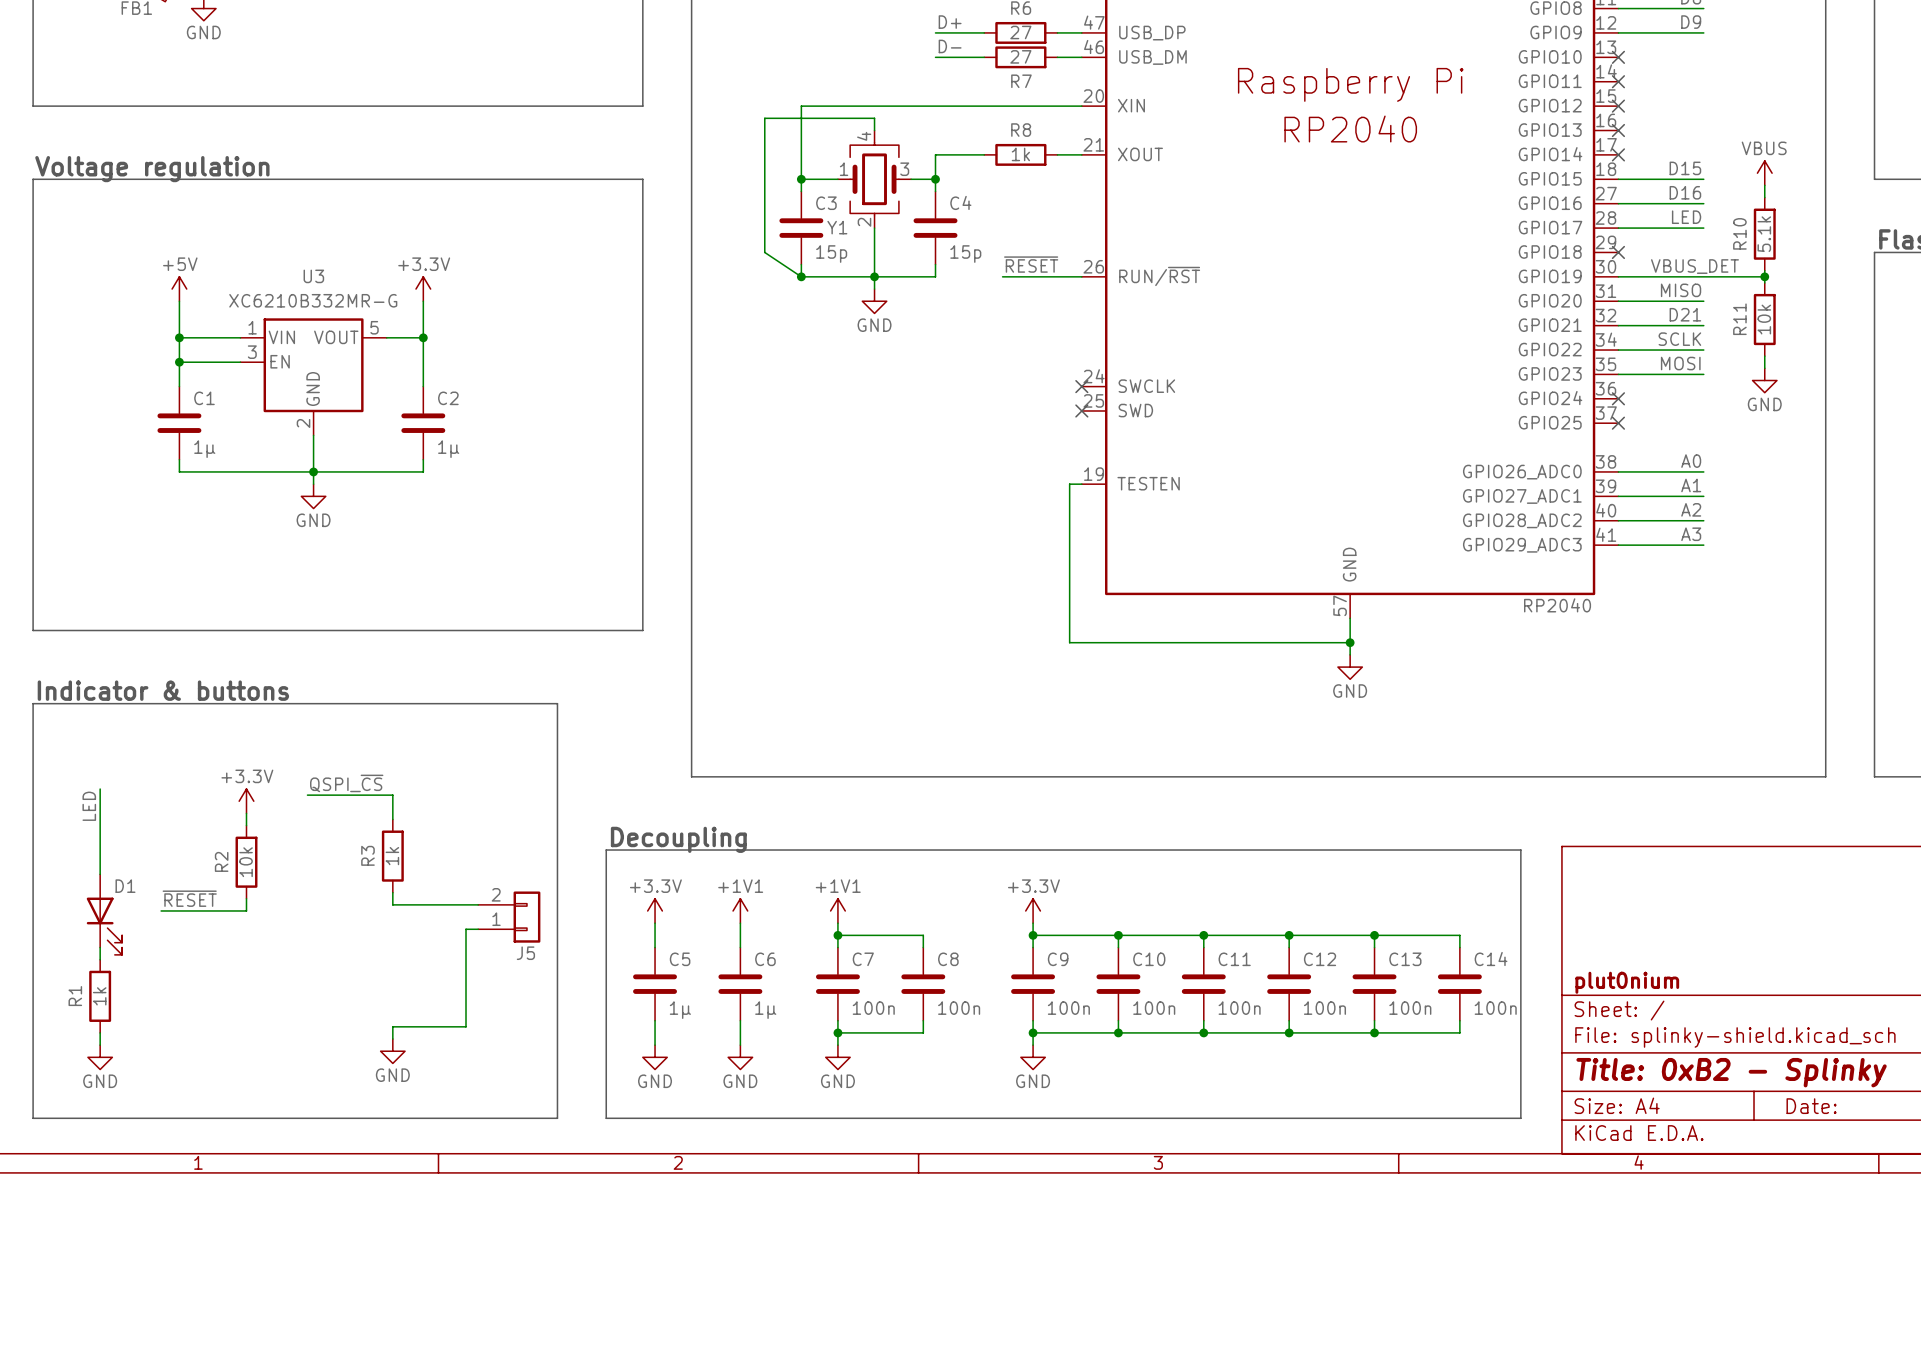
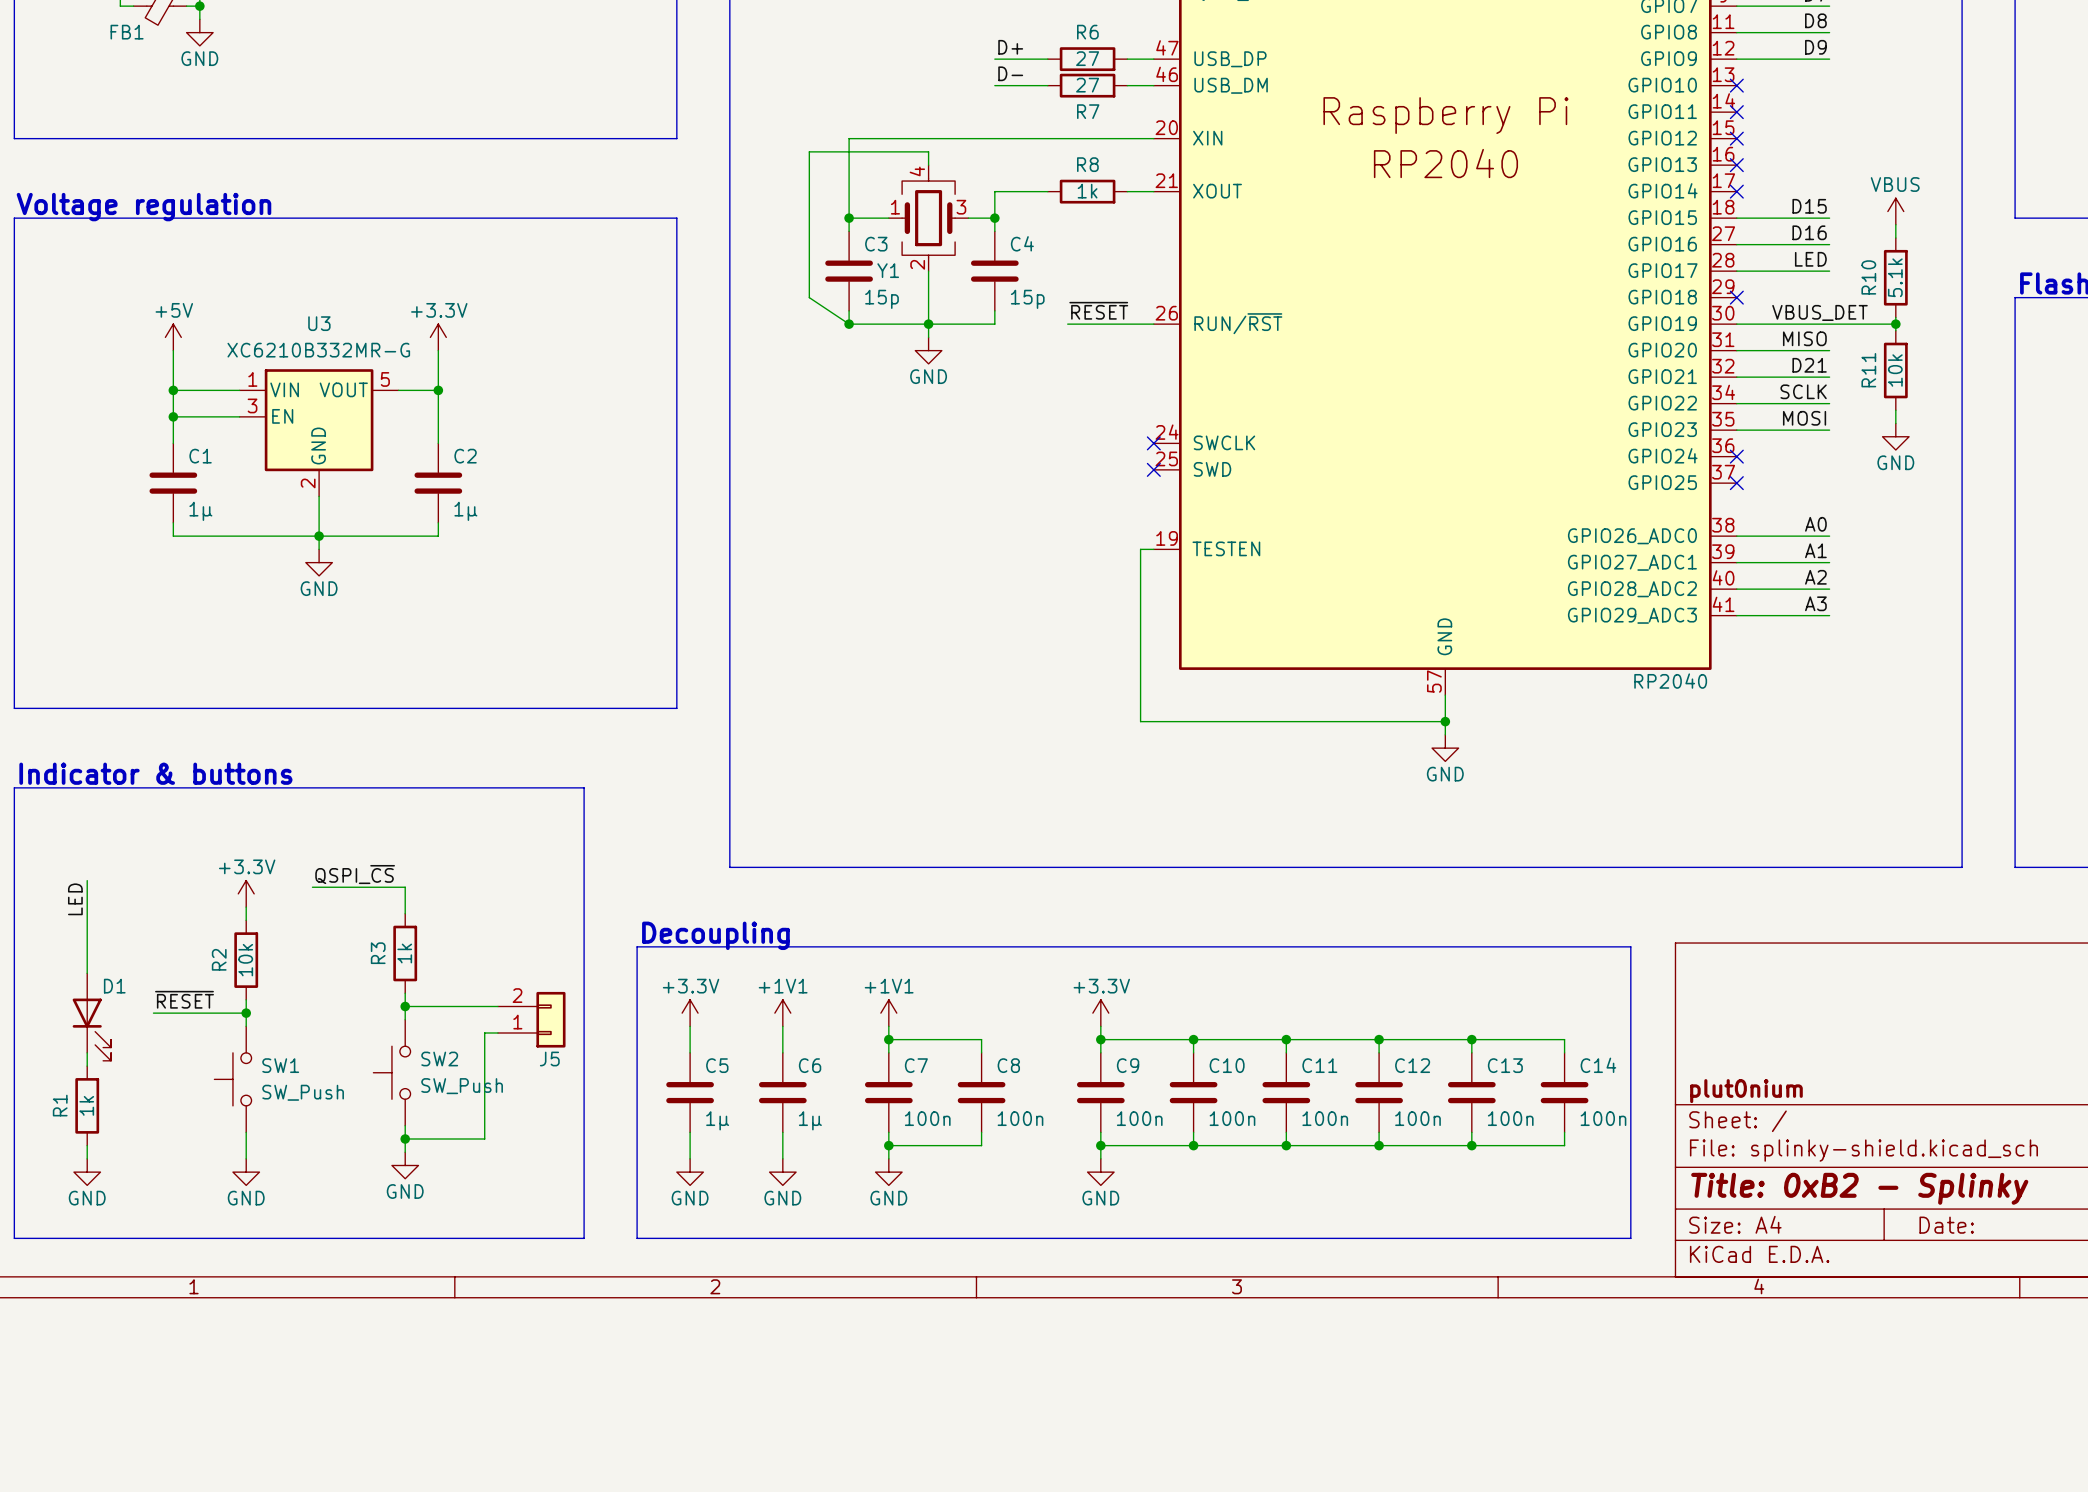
wire: none -> (405, 1006) (405, 1019)
junction: none -> (405, 1006)
wire: none -> (246, 1013) (246, 1026)
junction: none -> (246, 1013)
SW2: none -> SW_Push (391, 1072)
SW1: none -> SW_Push (232, 1079)
wire: none -> (405, 1125) (405, 1138)
wire: none -> (246, 1132) (246, 1158)
junction: none -> (405, 1138)
power symbol: none -> GND (246, 1172)

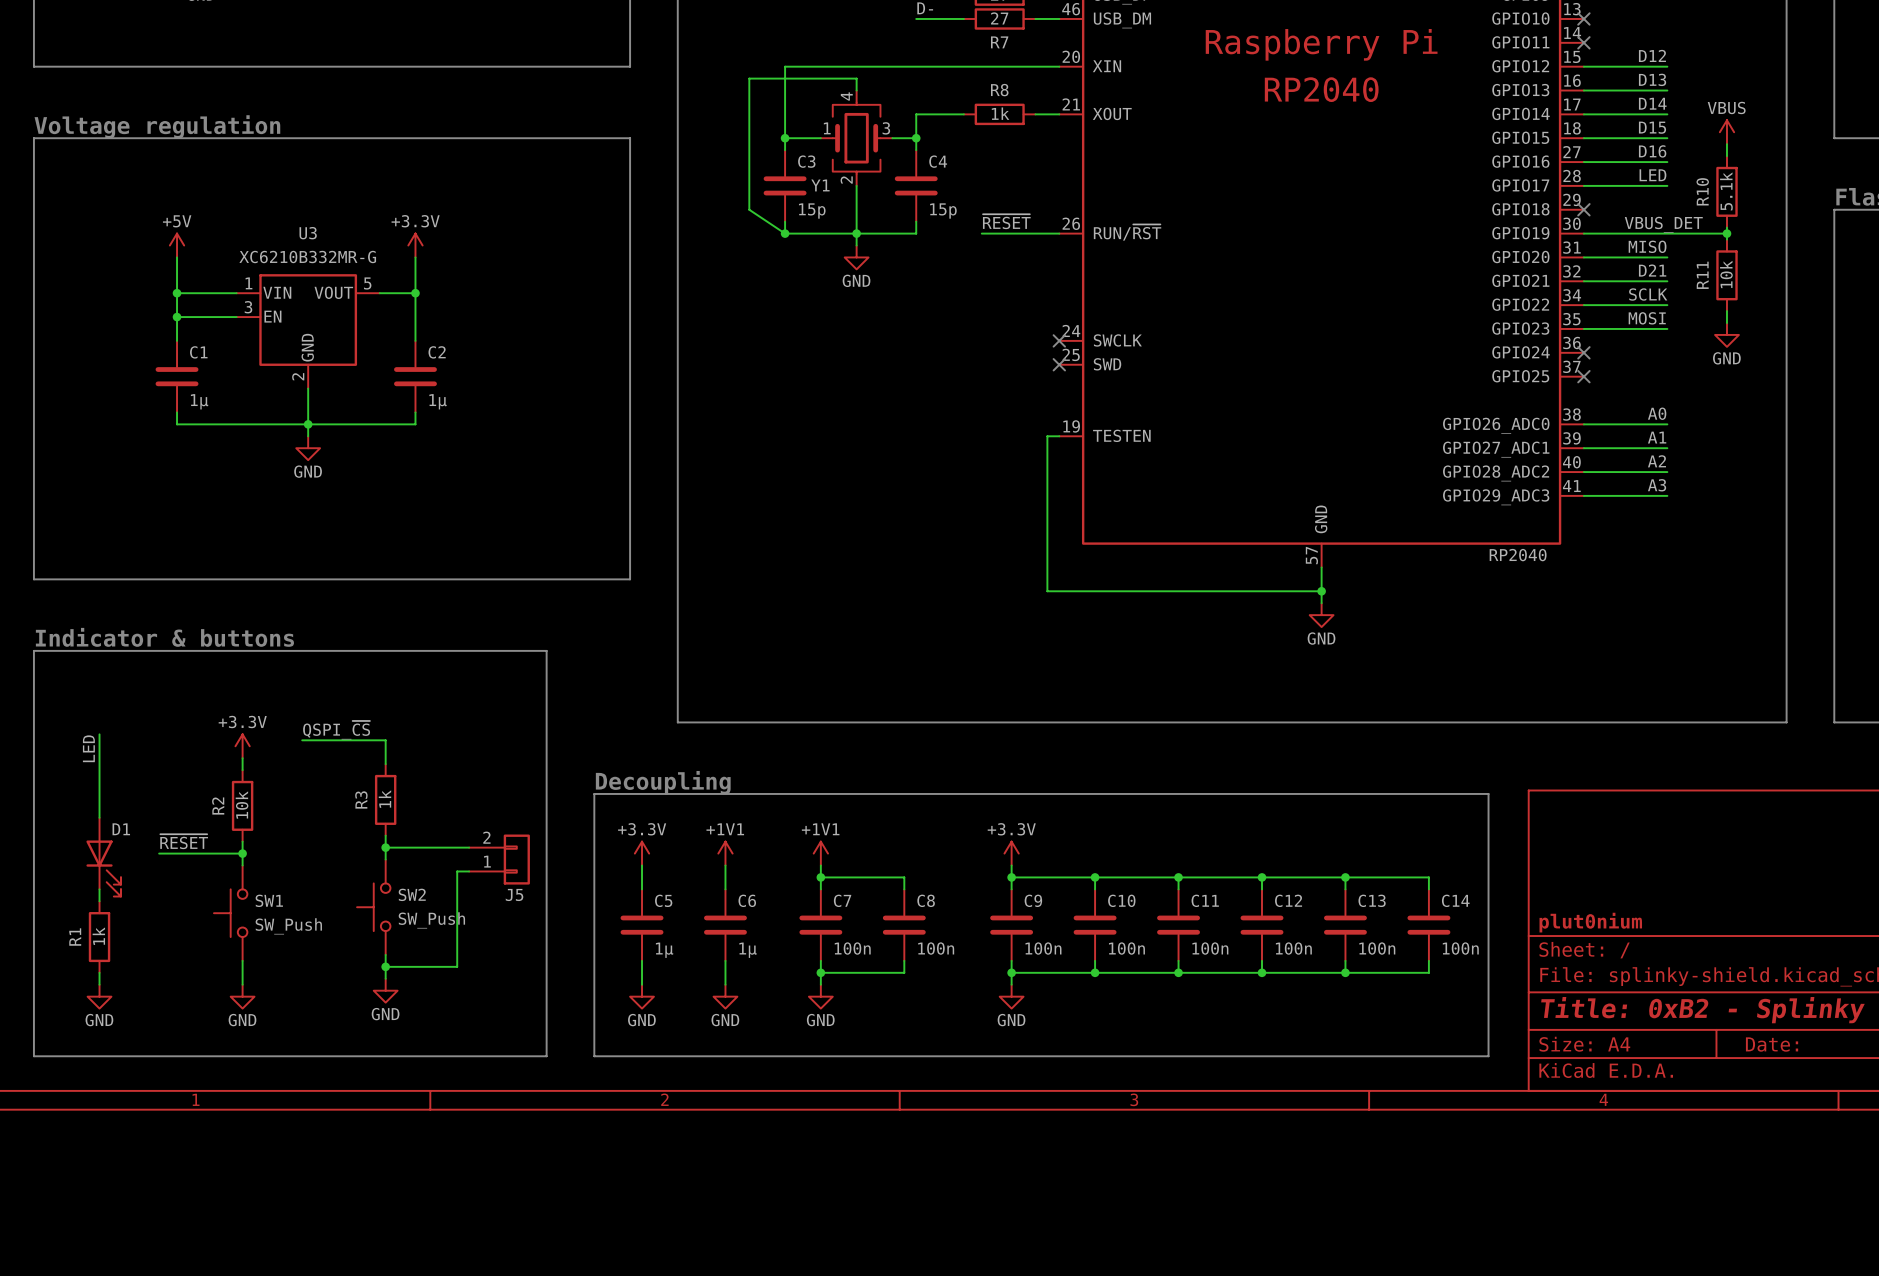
label: none -> D12 (1652, 55)
wire: none -> (1583, 66) (1667, 66)
no-connect mark: (1736, 138) -> none
label: none -> D13 (1652, 79)
wire: none -> (1583, 90) (1667, 90)
no-connect mark: (1736, 165) -> none
label: none -> D14 (1652, 103)
wire: none -> (1583, 114) (1667, 114)
no-connect mark: (1736, 191) -> none

